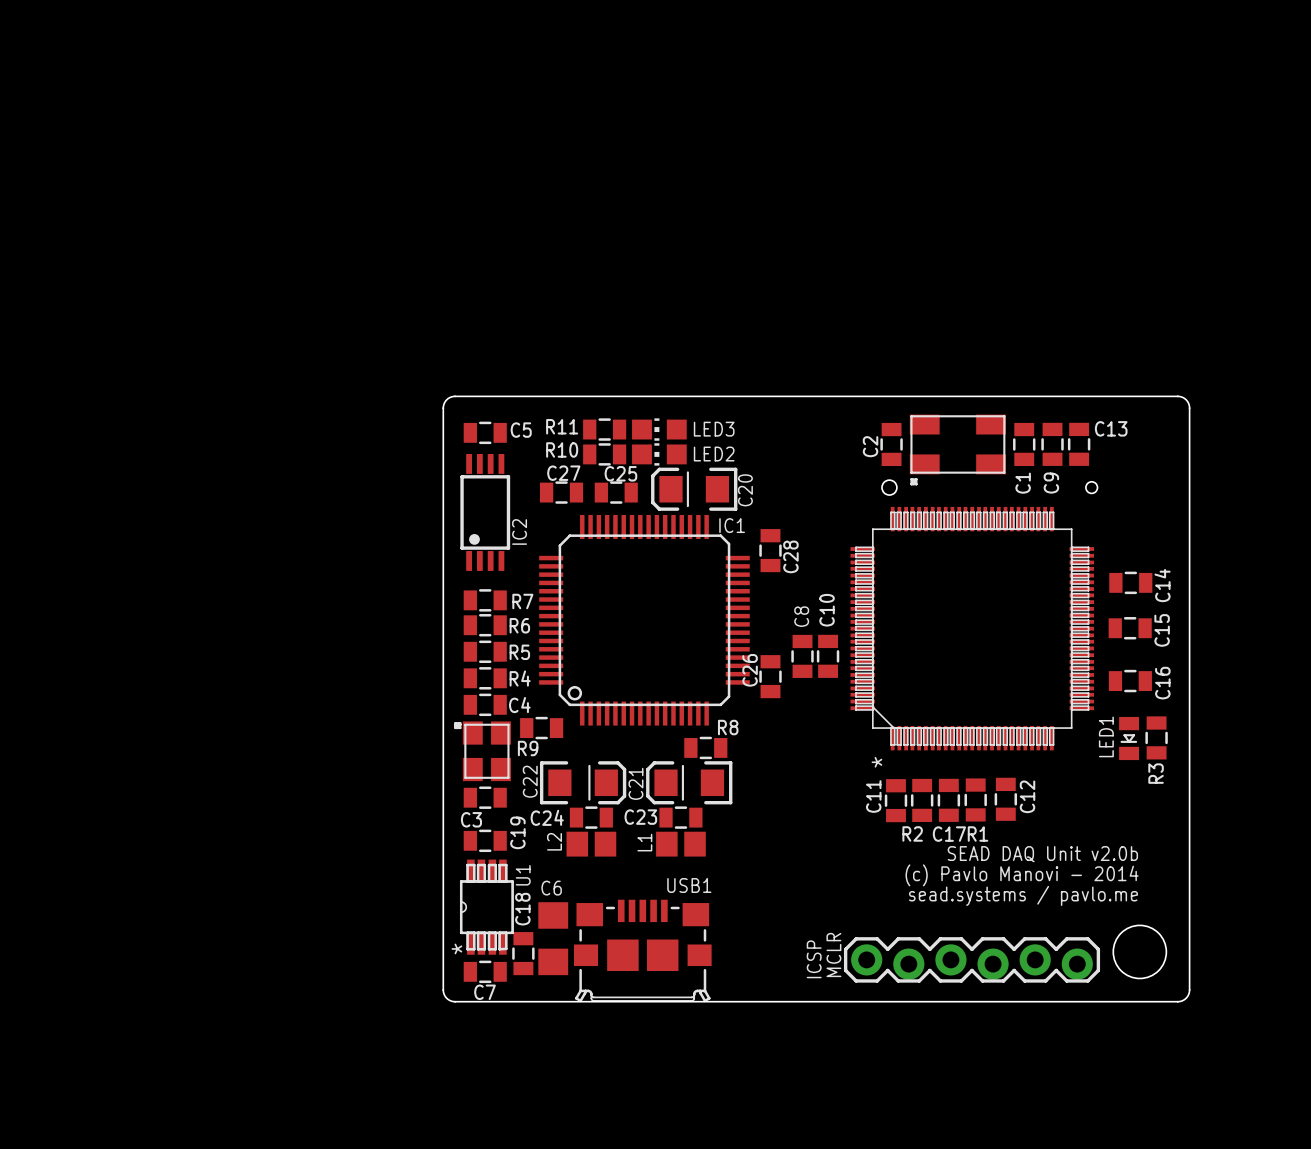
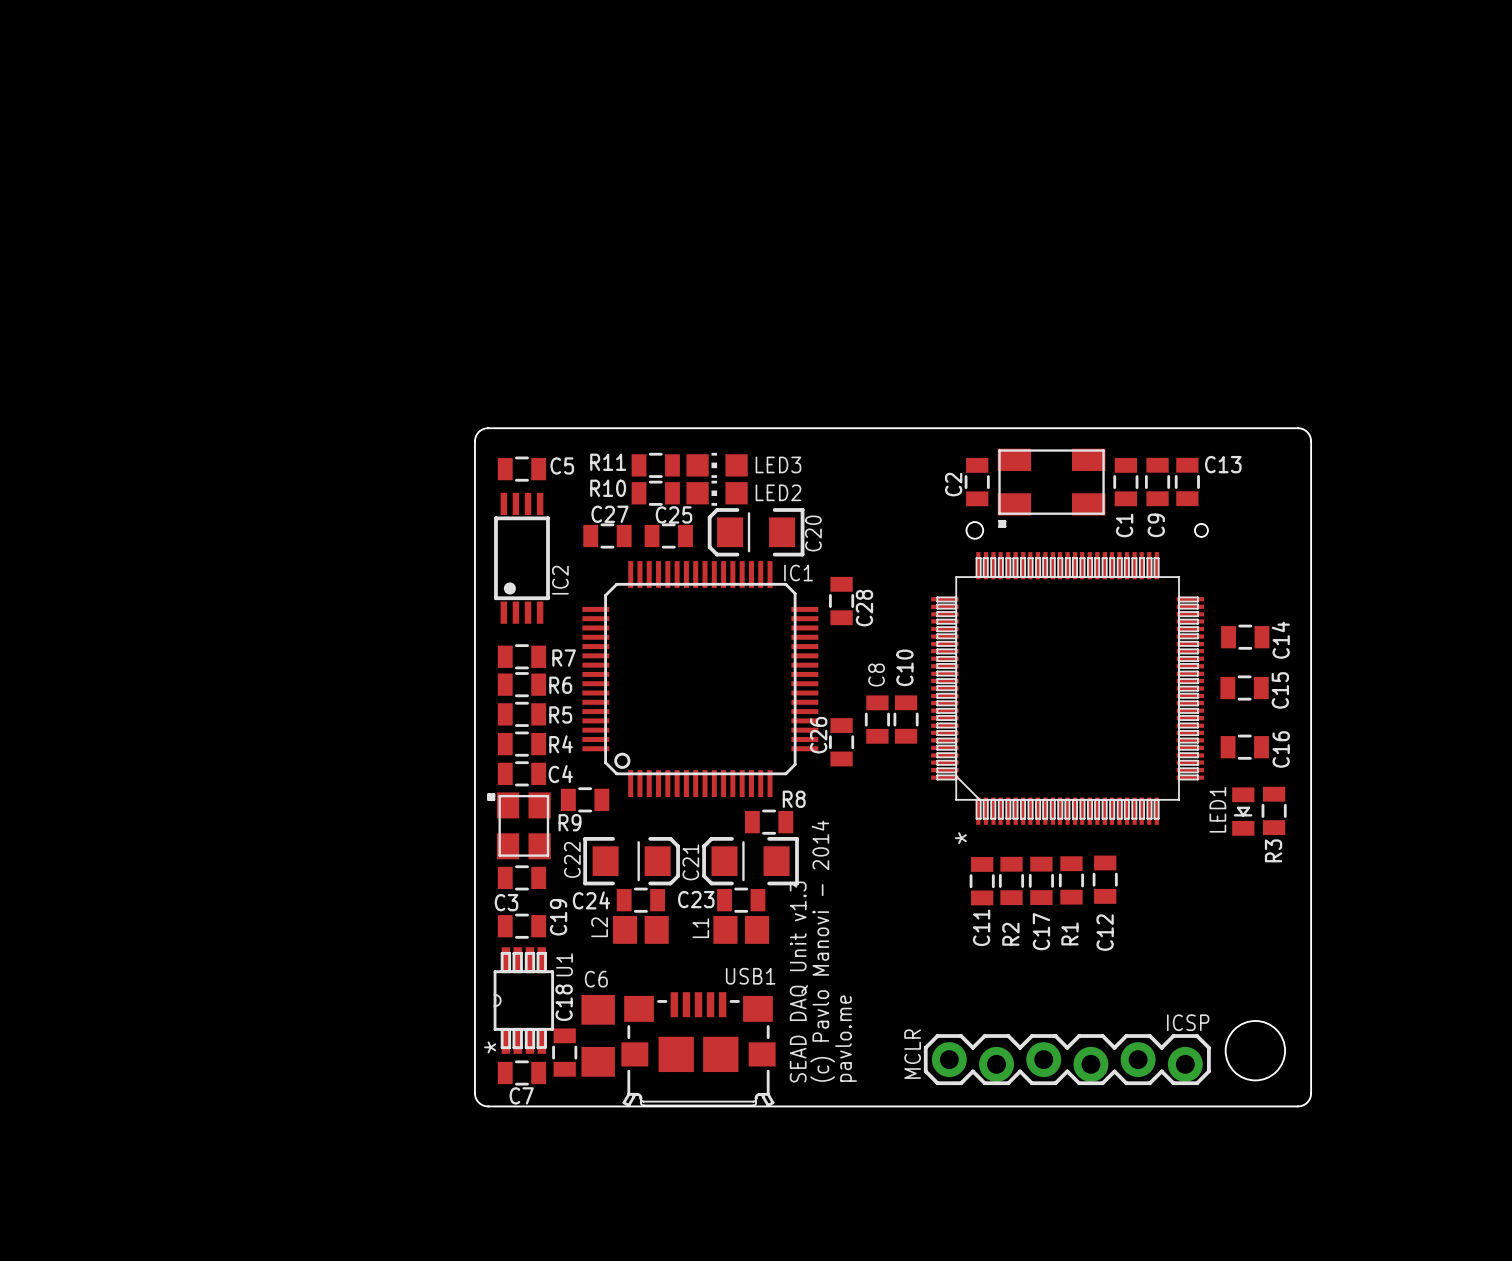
C11 name position: C11 (873, 796) -> C11 (981, 927)
C12 name position: C12 (1027, 796) -> C12 (1105, 932)
R2 name rotation: 0° (912, 833) -> 90° counterclockwise (1010, 934)
C17 name rotation: 0° (949, 834) -> 90° counterclockwise (1041, 931)
R1 name rotation: 0° (978, 834) -> 90° counterclockwise (1069, 933)
text: SEAD DAQ Unit v2.0b (1042, 854) -> none
text rotation: 0° (1022, 875) -> 90° counterclockwise (822, 951)
text: none -> SEAD DAQ Unit v1.3 (798, 982)
text: sead.systems / pavlo.me (1023, 895) -> none
text: none -> pavlo.me (846, 1038)
text rotation: 0° (814, 959) -> 90° clockwise (1188, 1022)
text position: ICSP (814, 959) -> ICSP (1188, 1022)

